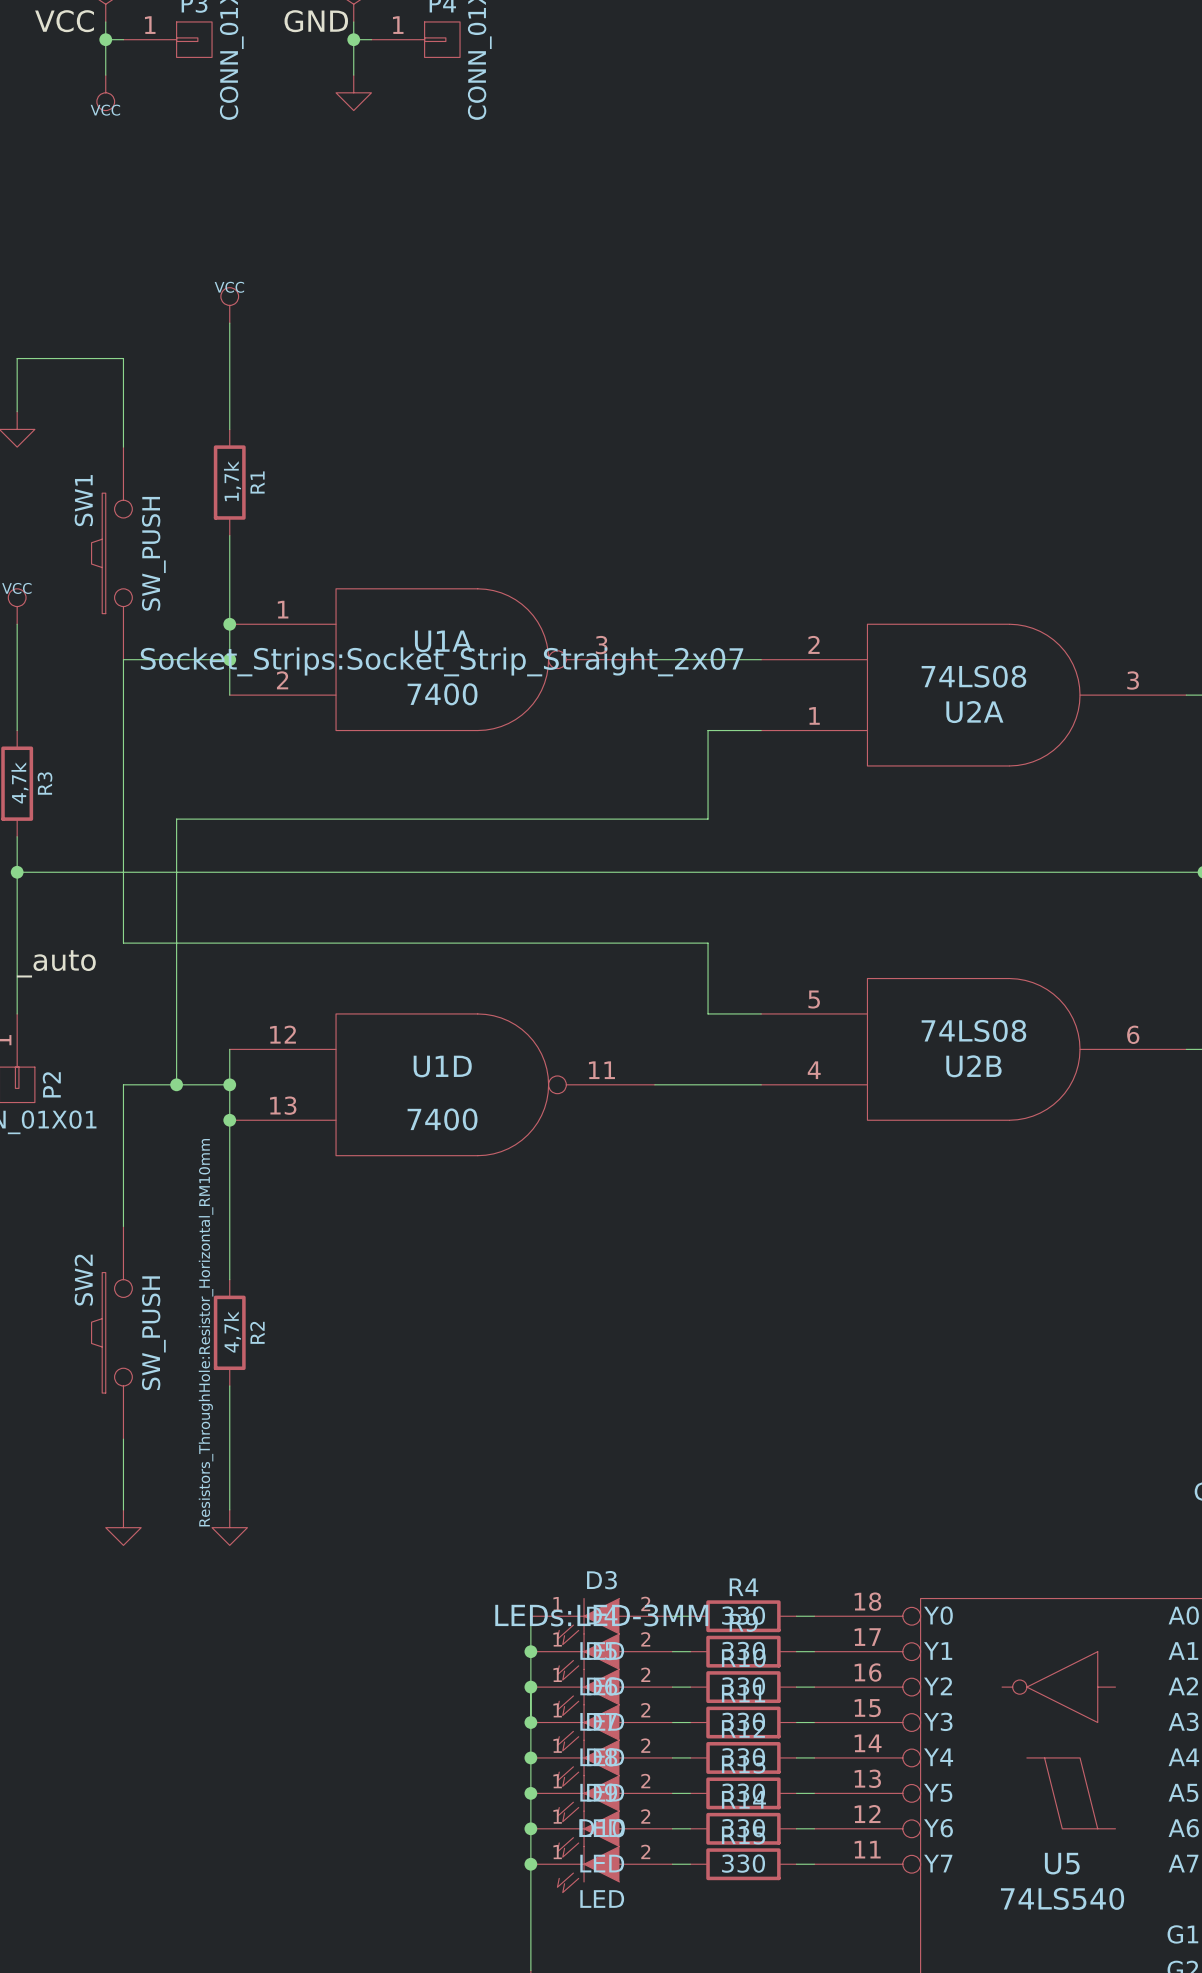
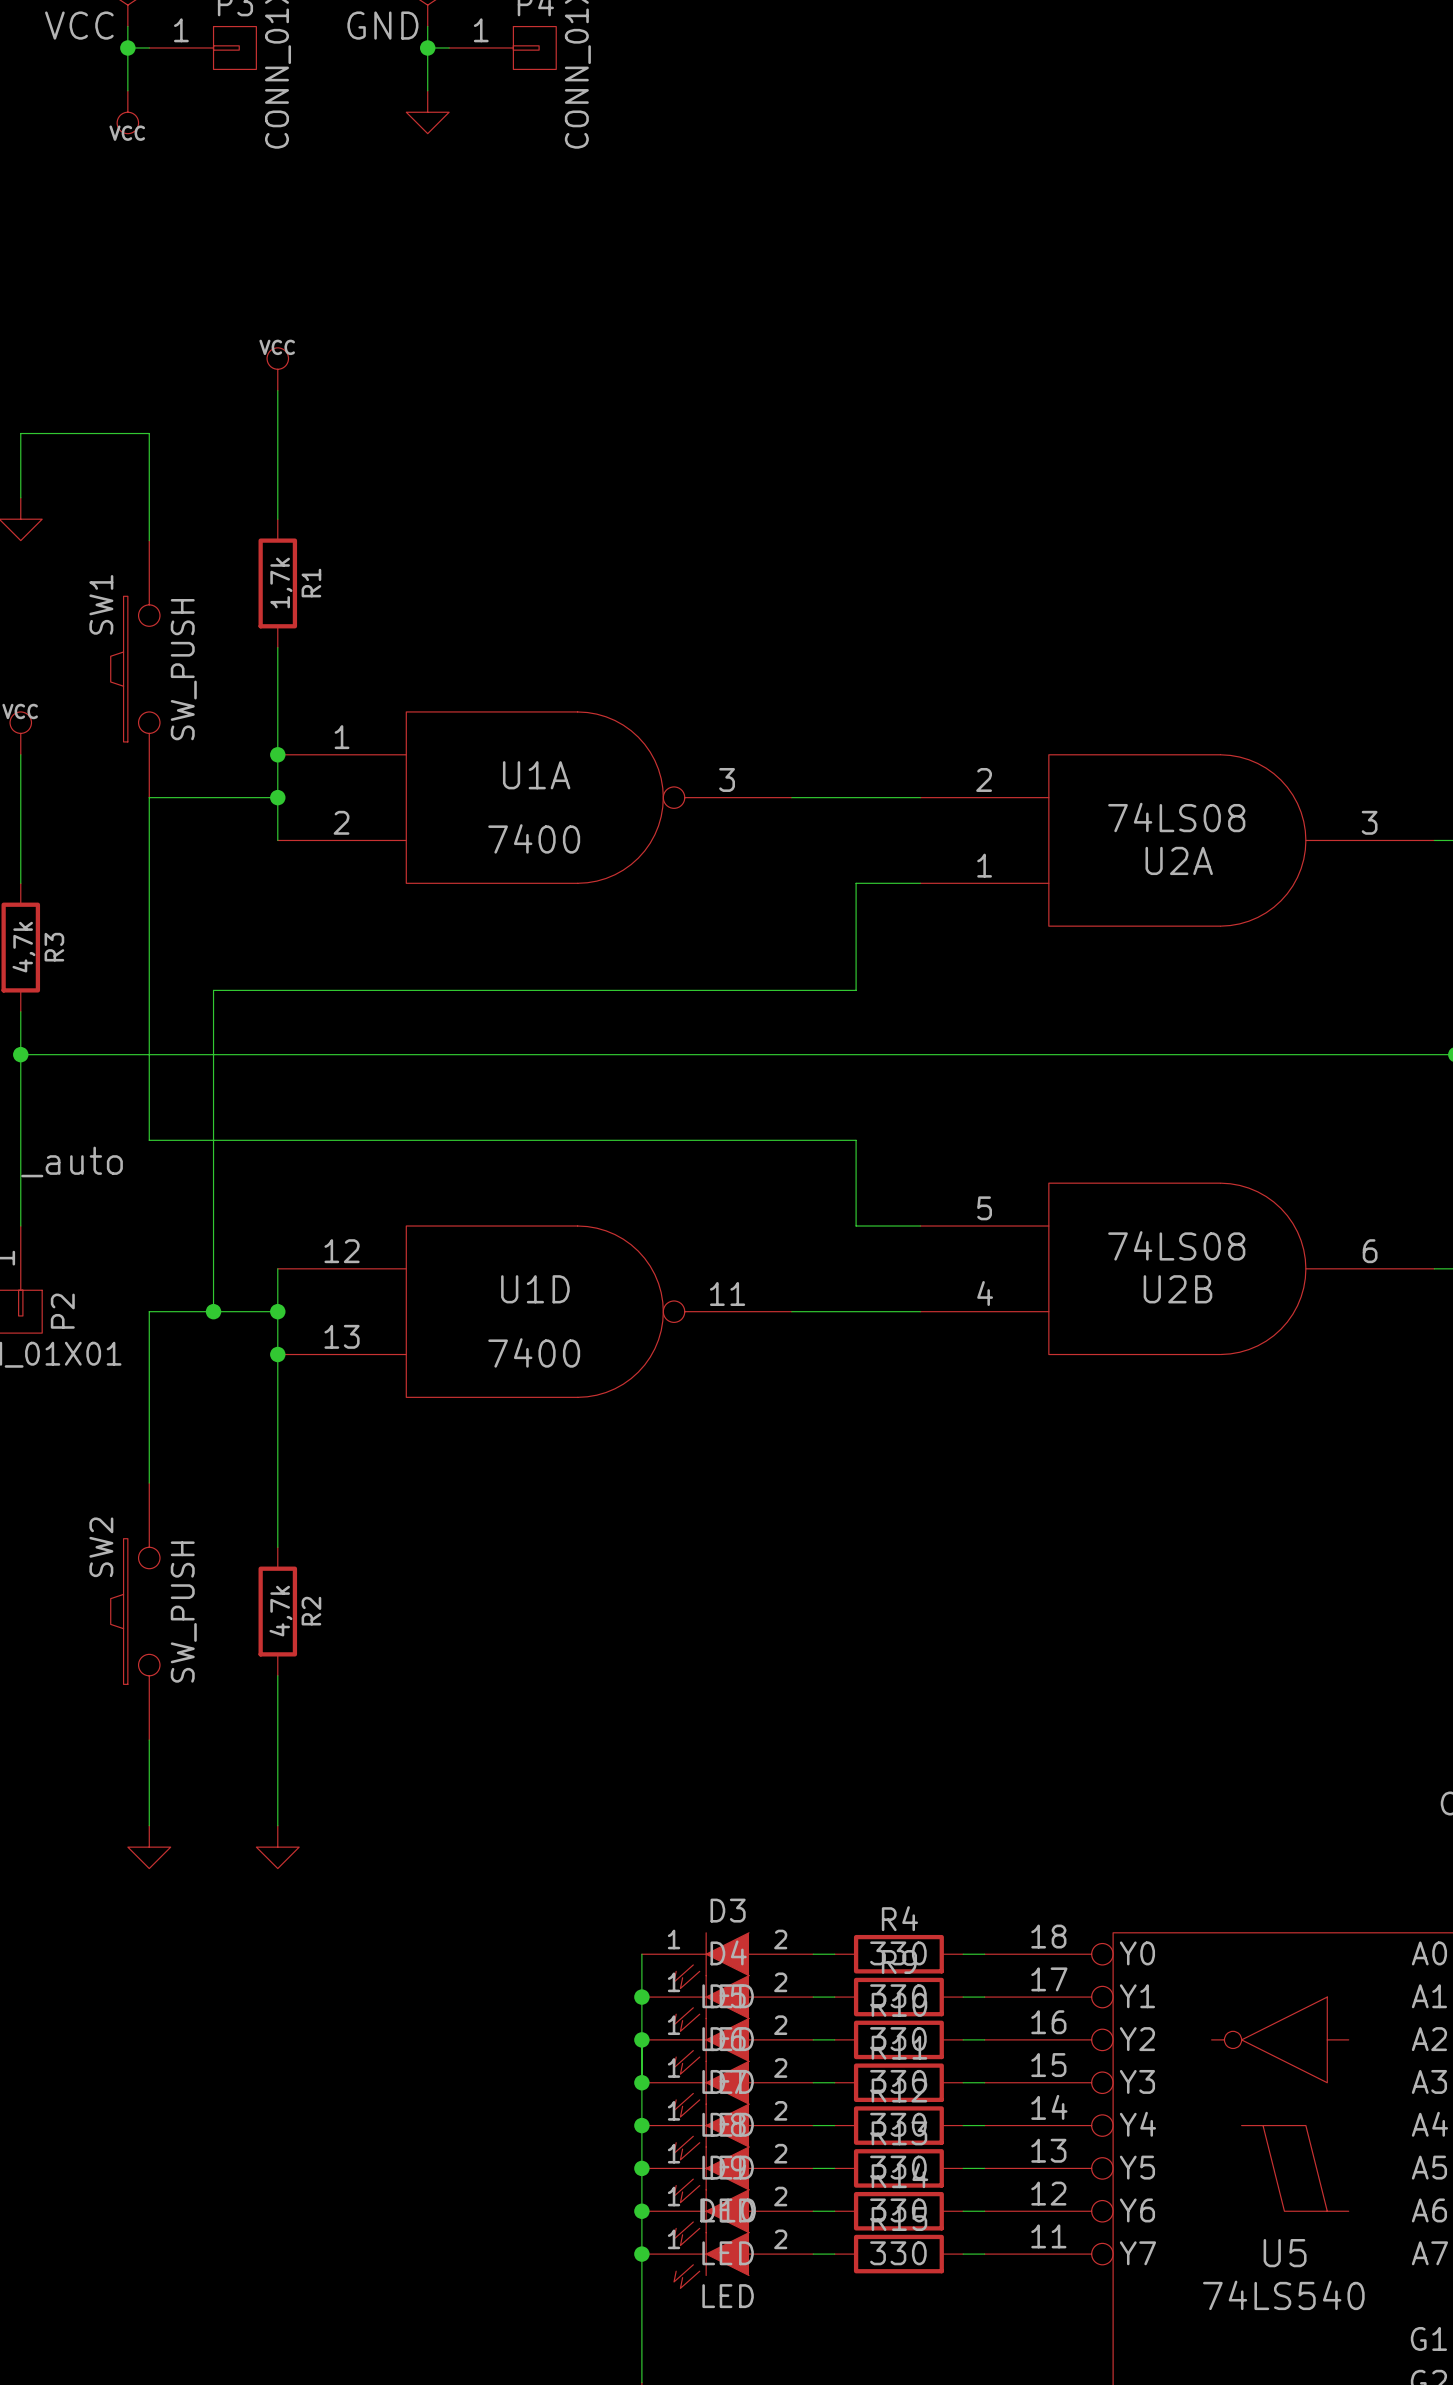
U1A text: Socket_Strips:Socket_Strip_Straight_2x07 (442, 661) -> none
R2 text: Resistors_ThroughHole:Resistor_Horizontal_RM10mm (206, 1332) -> none
D3 text: LEDs:LED-3MM (601, 1615) -> none

